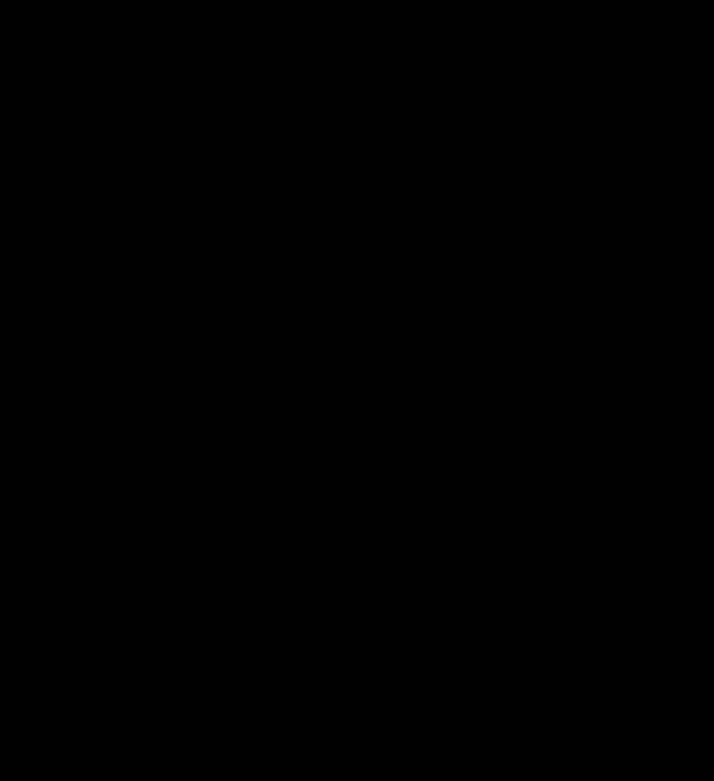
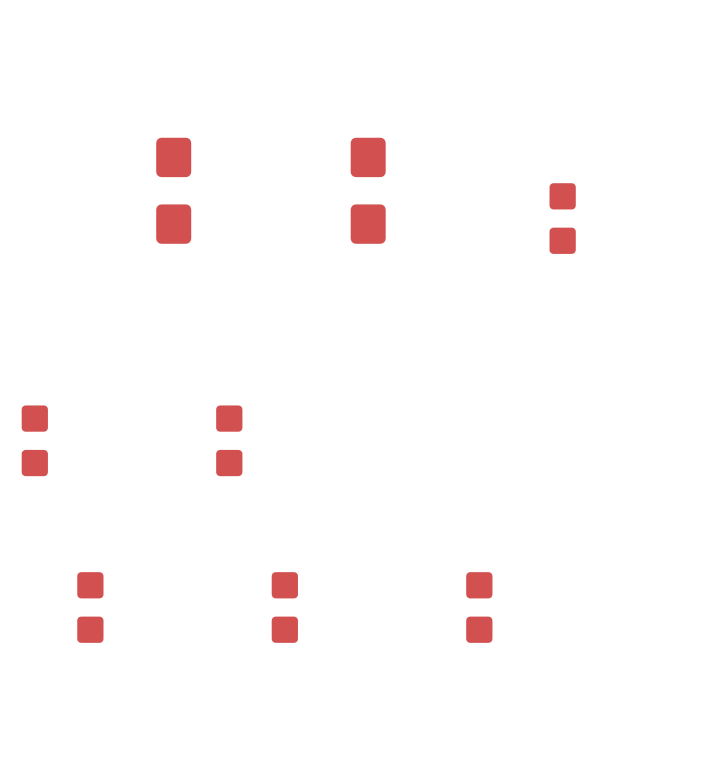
part: none -> (173, 190)
part: none -> (368, 190)
part: none -> (562, 218)
part: none -> (34, 440)
part: none -> (229, 440)
part: none -> (90, 607)
part: none -> (284, 607)
part: none -> (479, 607)

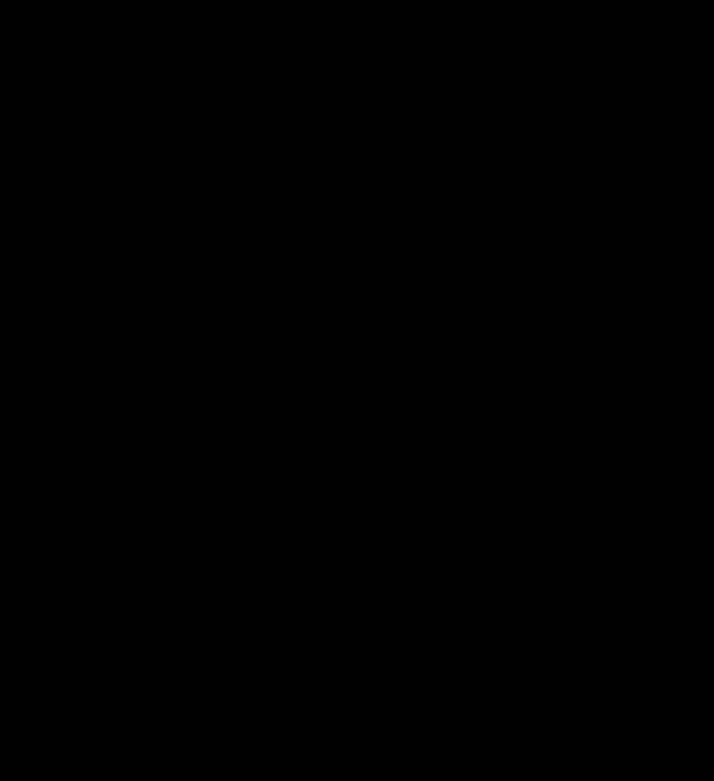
part: (173, 190) -> none
part: (368, 190) -> none
part: (562, 218) -> none
part: (34, 440) -> none
part: (229, 440) -> none
part: (90, 607) -> none
part: (284, 607) -> none
part: (479, 607) -> none

